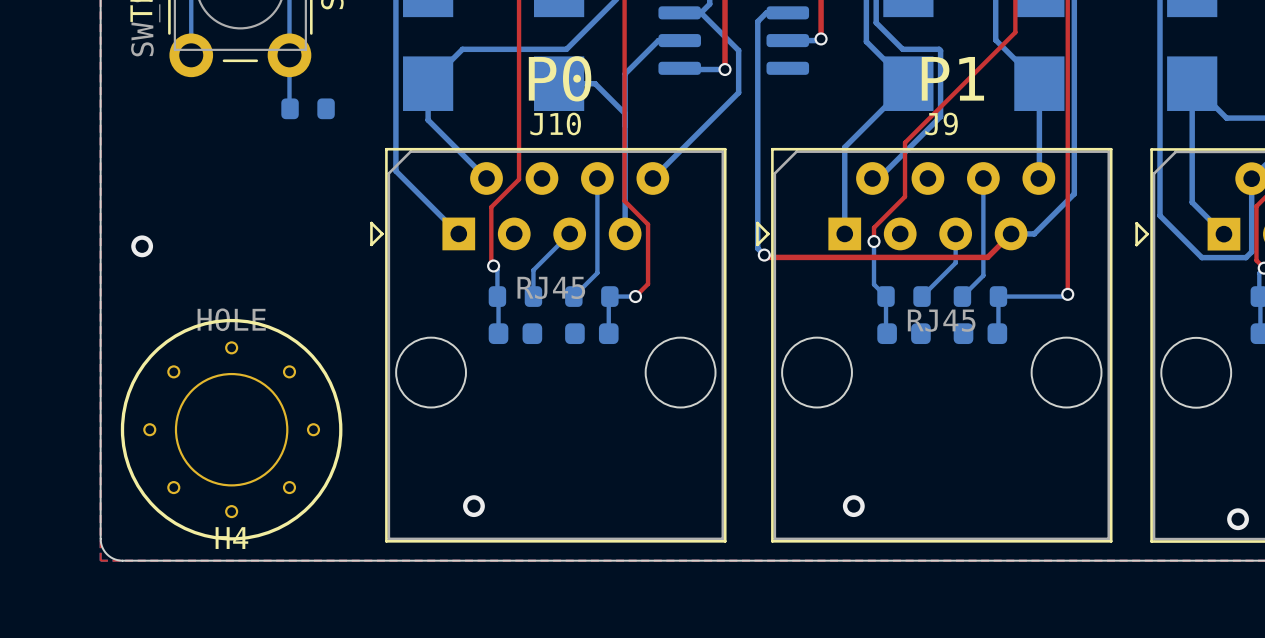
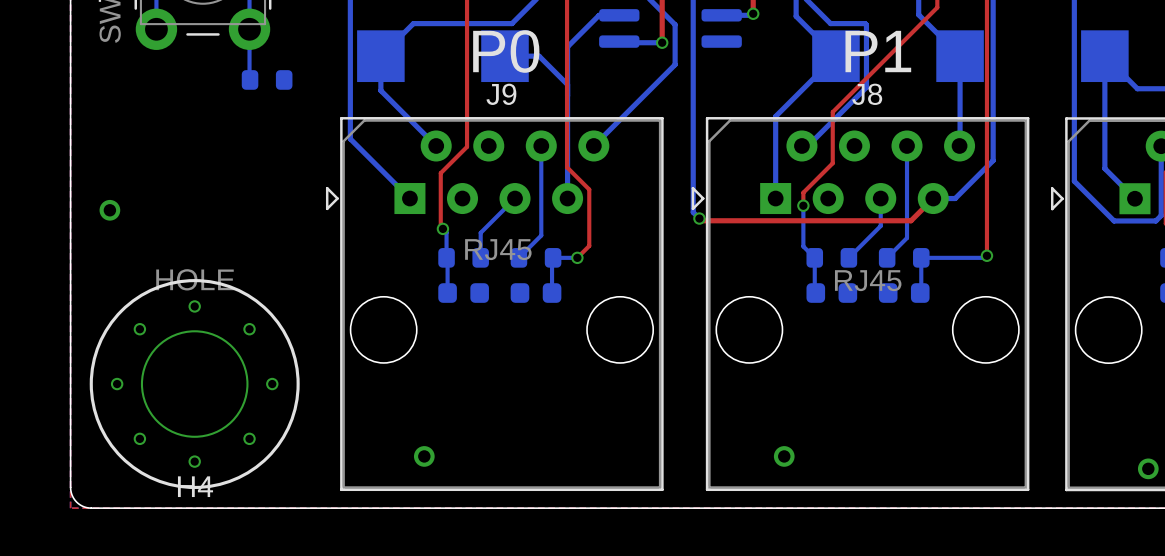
J10 name: J10 (555, 123) -> J9 (501, 94)
J9 name: J9 (941, 123) -> J8 (867, 94)

